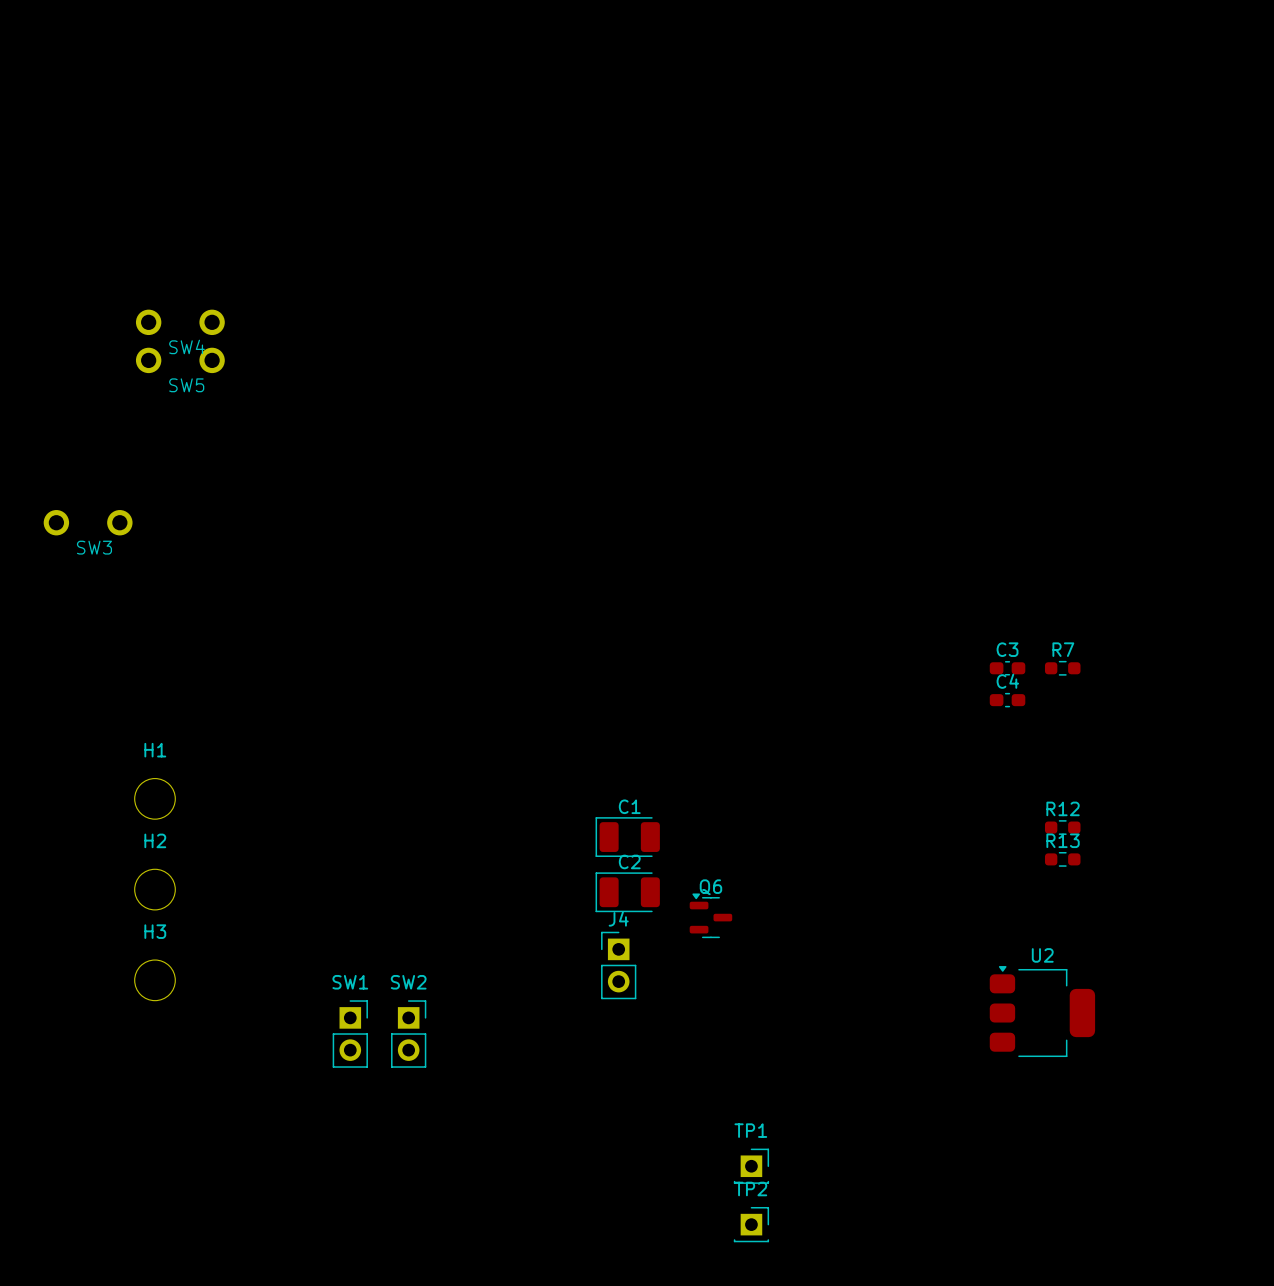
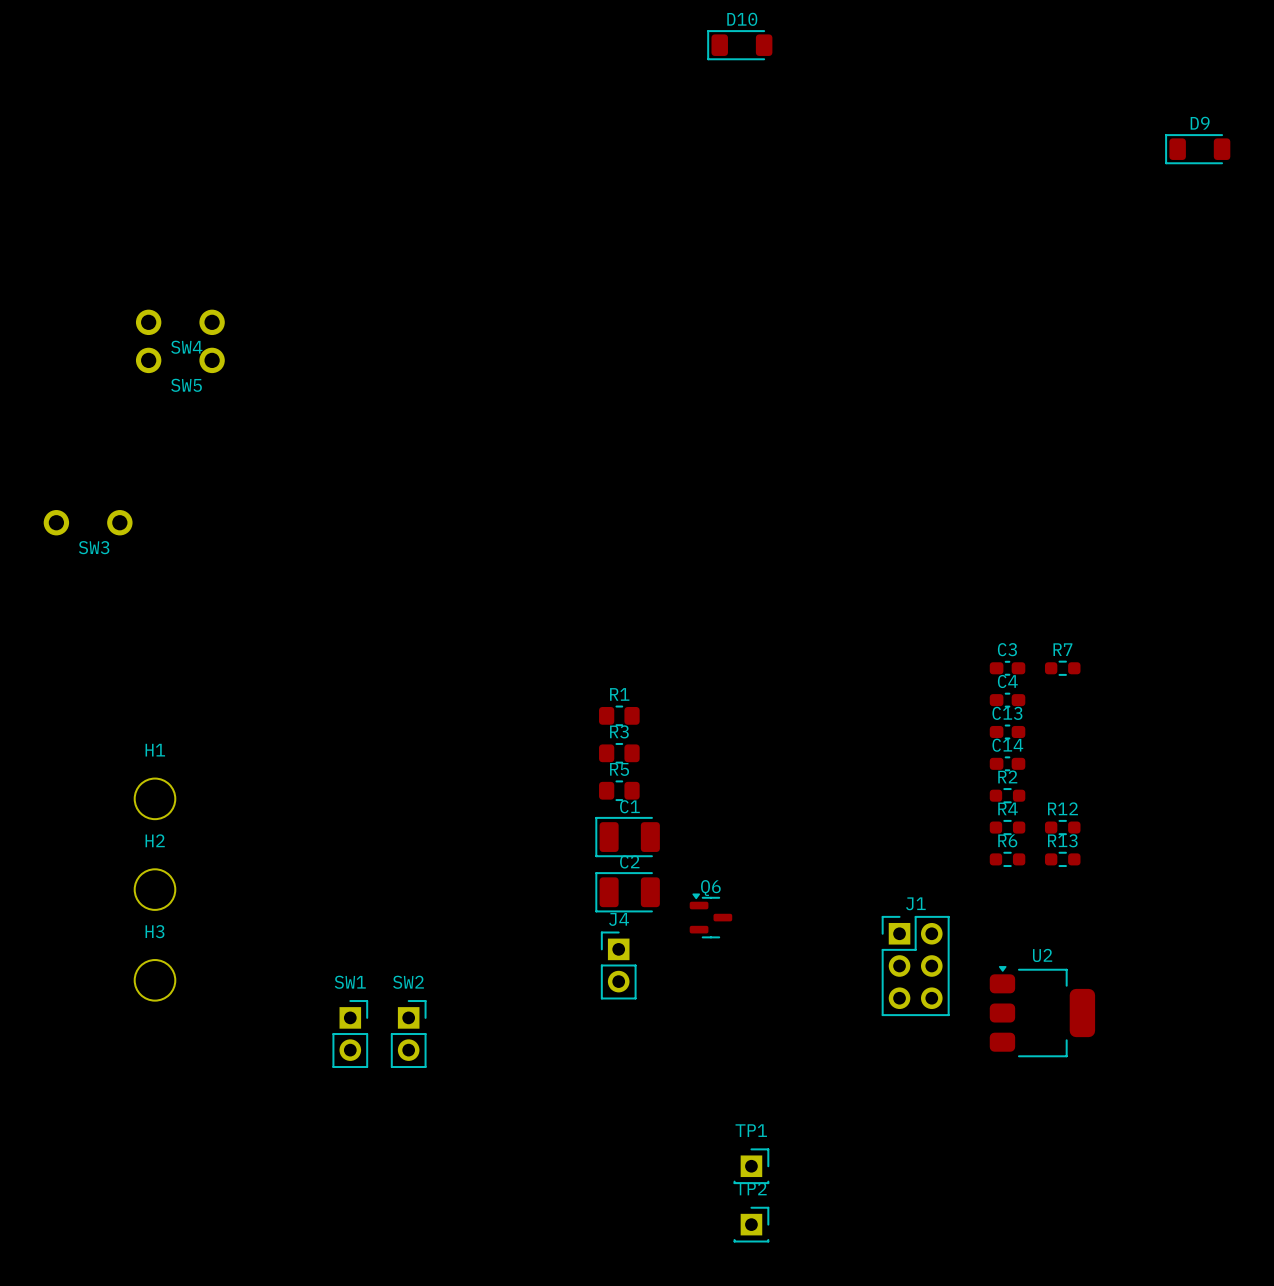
D10: none -> (739, 45)
D9: none -> (1197, 149)
R1: none -> (619, 715)
C13: none -> (1007, 731)
R3: none -> (619, 753)
C14: none -> (1007, 763)
R5: none -> (619, 790)
R2: none -> (1007, 795)
R4: none -> (1007, 827)
R6: none -> (1007, 859)
J1: none -> (915, 965)

